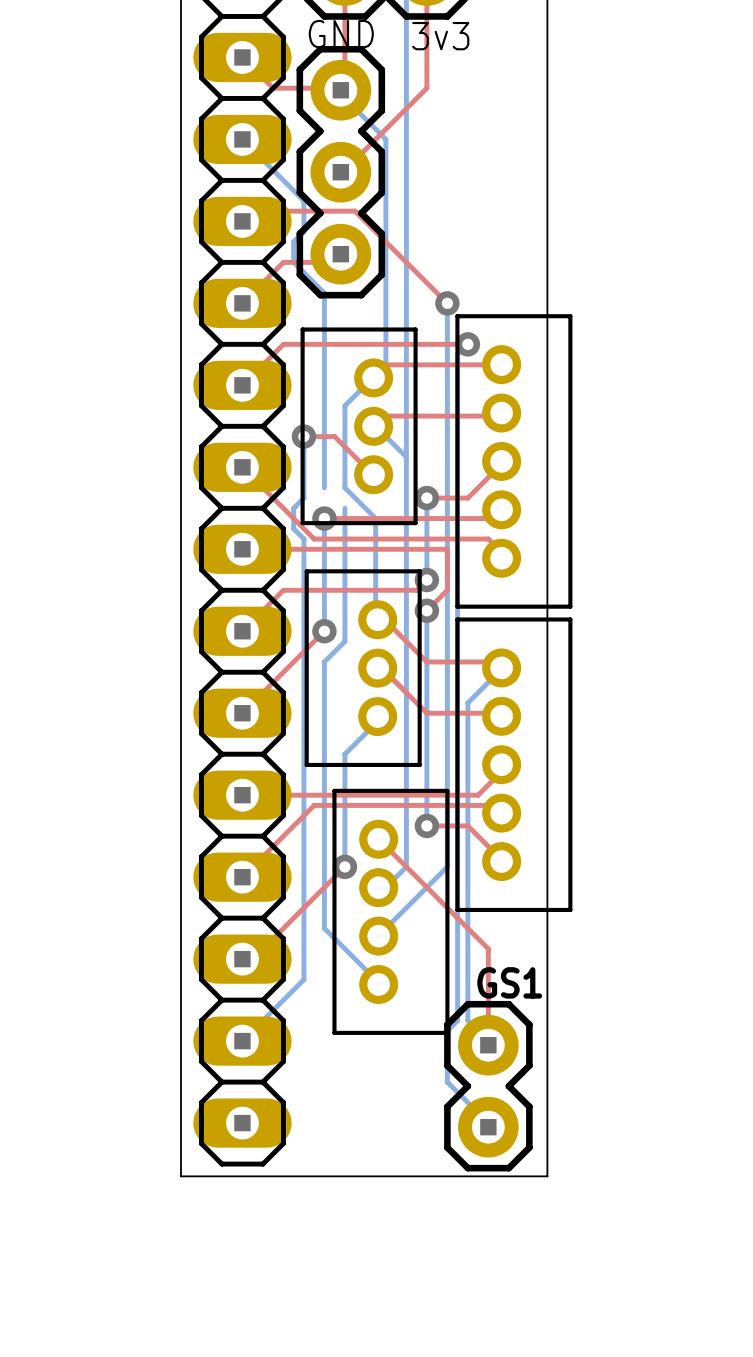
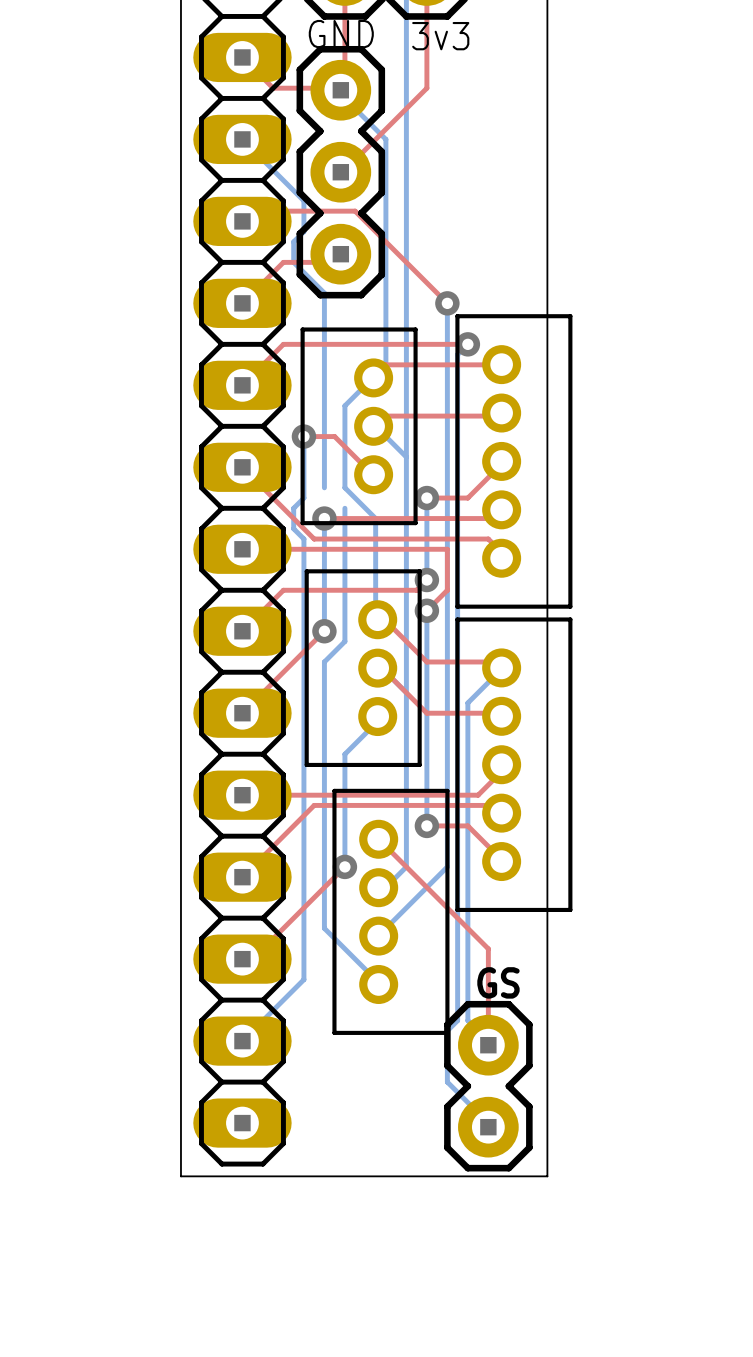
GS1 name: GS1 (509, 982) -> GS (498, 982)

